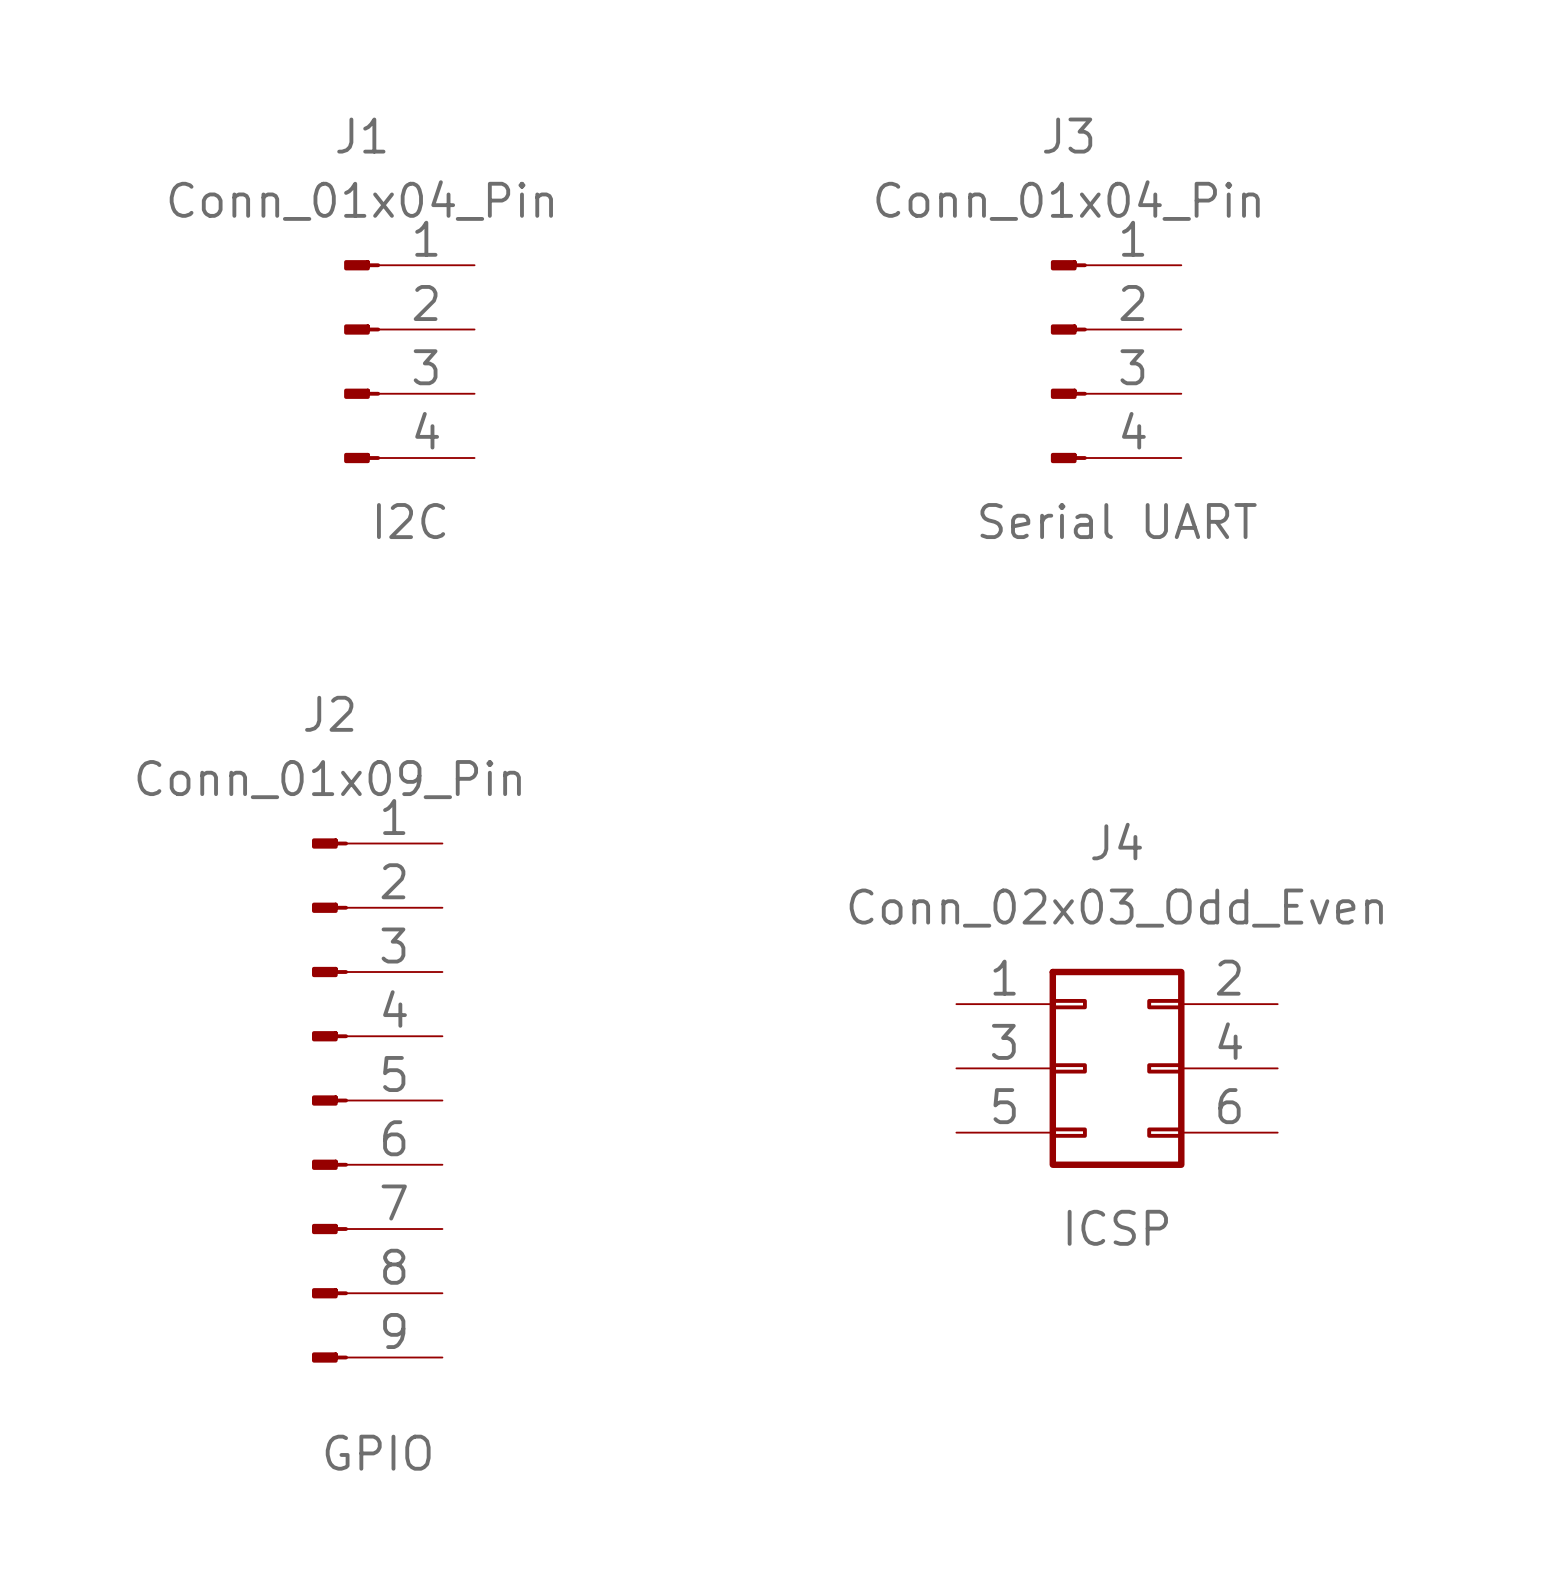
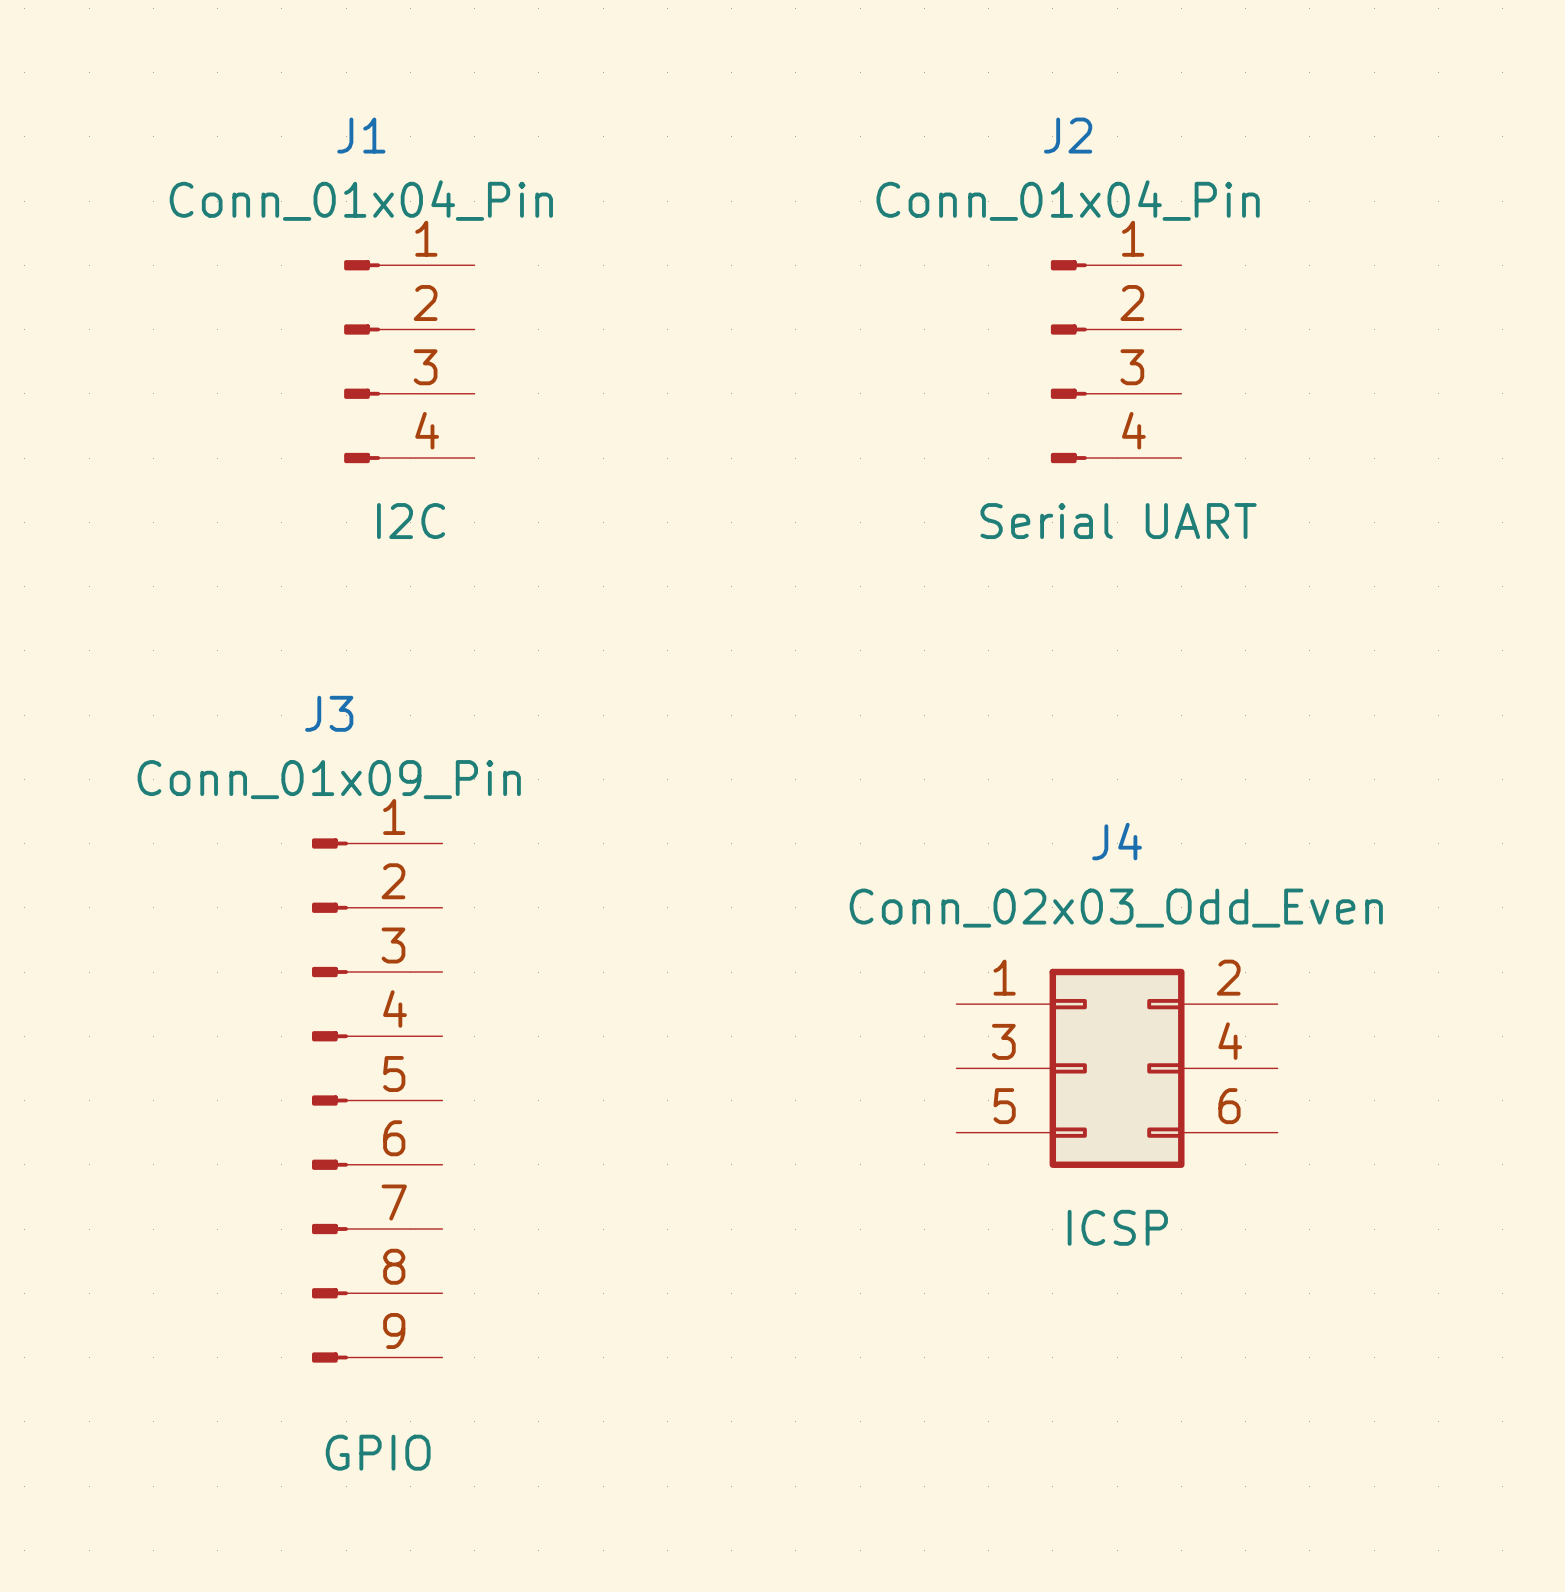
J3 name: J3 (1068, 135) -> J2 (1068, 135)
J2 name: J2 (329, 713) -> J3 (329, 713)

